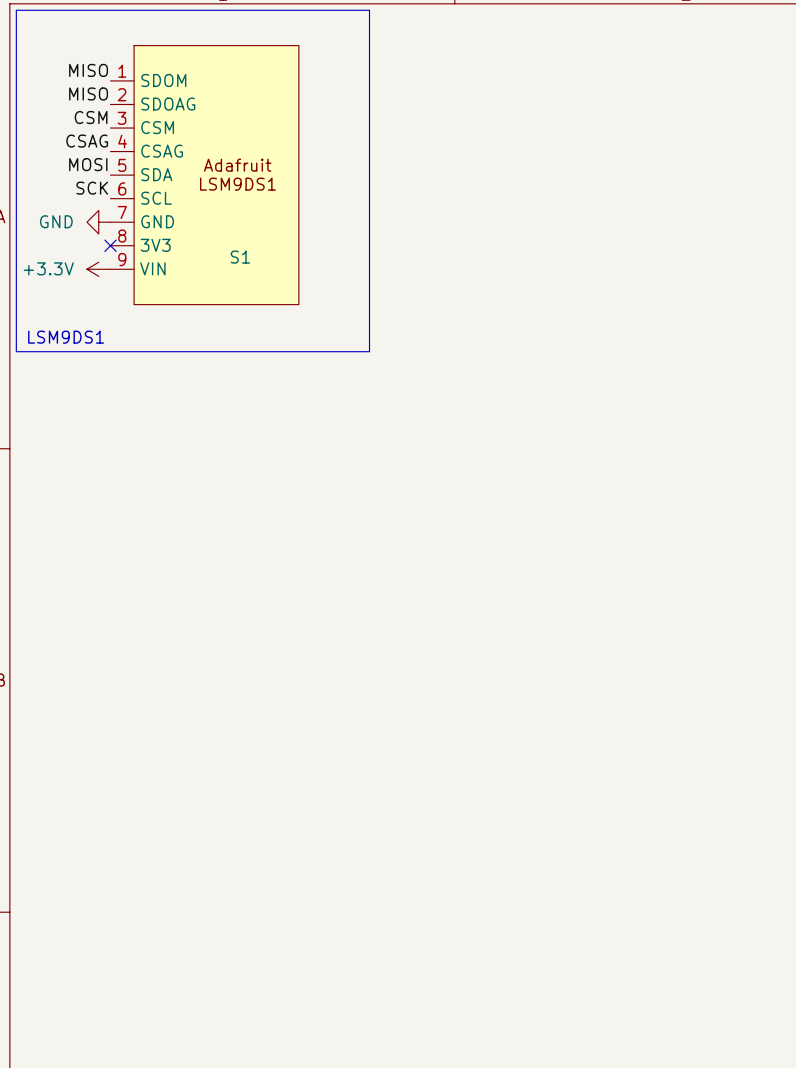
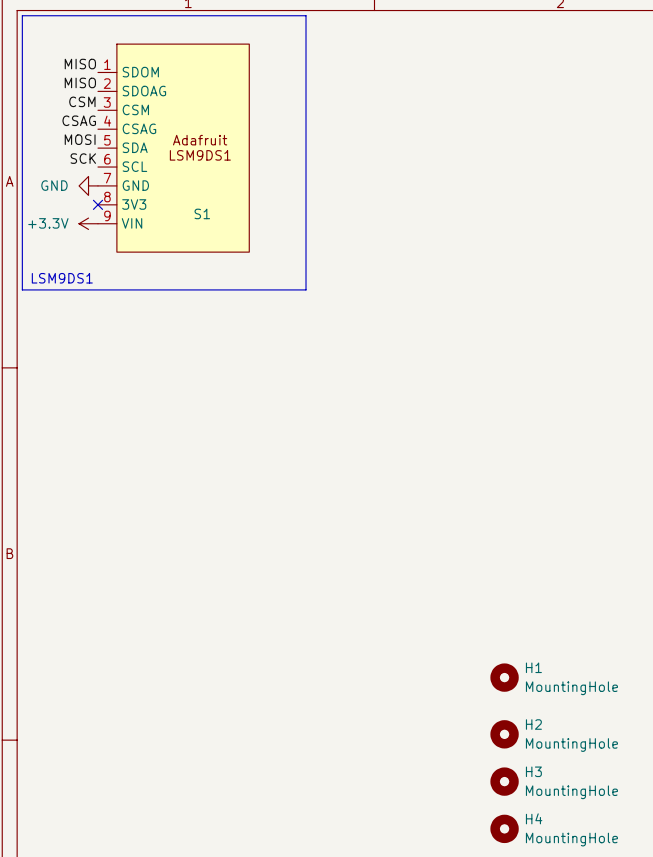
H1: none -> MountingHole (504, 677)
H2: none -> MountingHole (504, 734)
H3: none -> MountingHole (504, 781)
H4: none -> MountingHole (504, 828)

